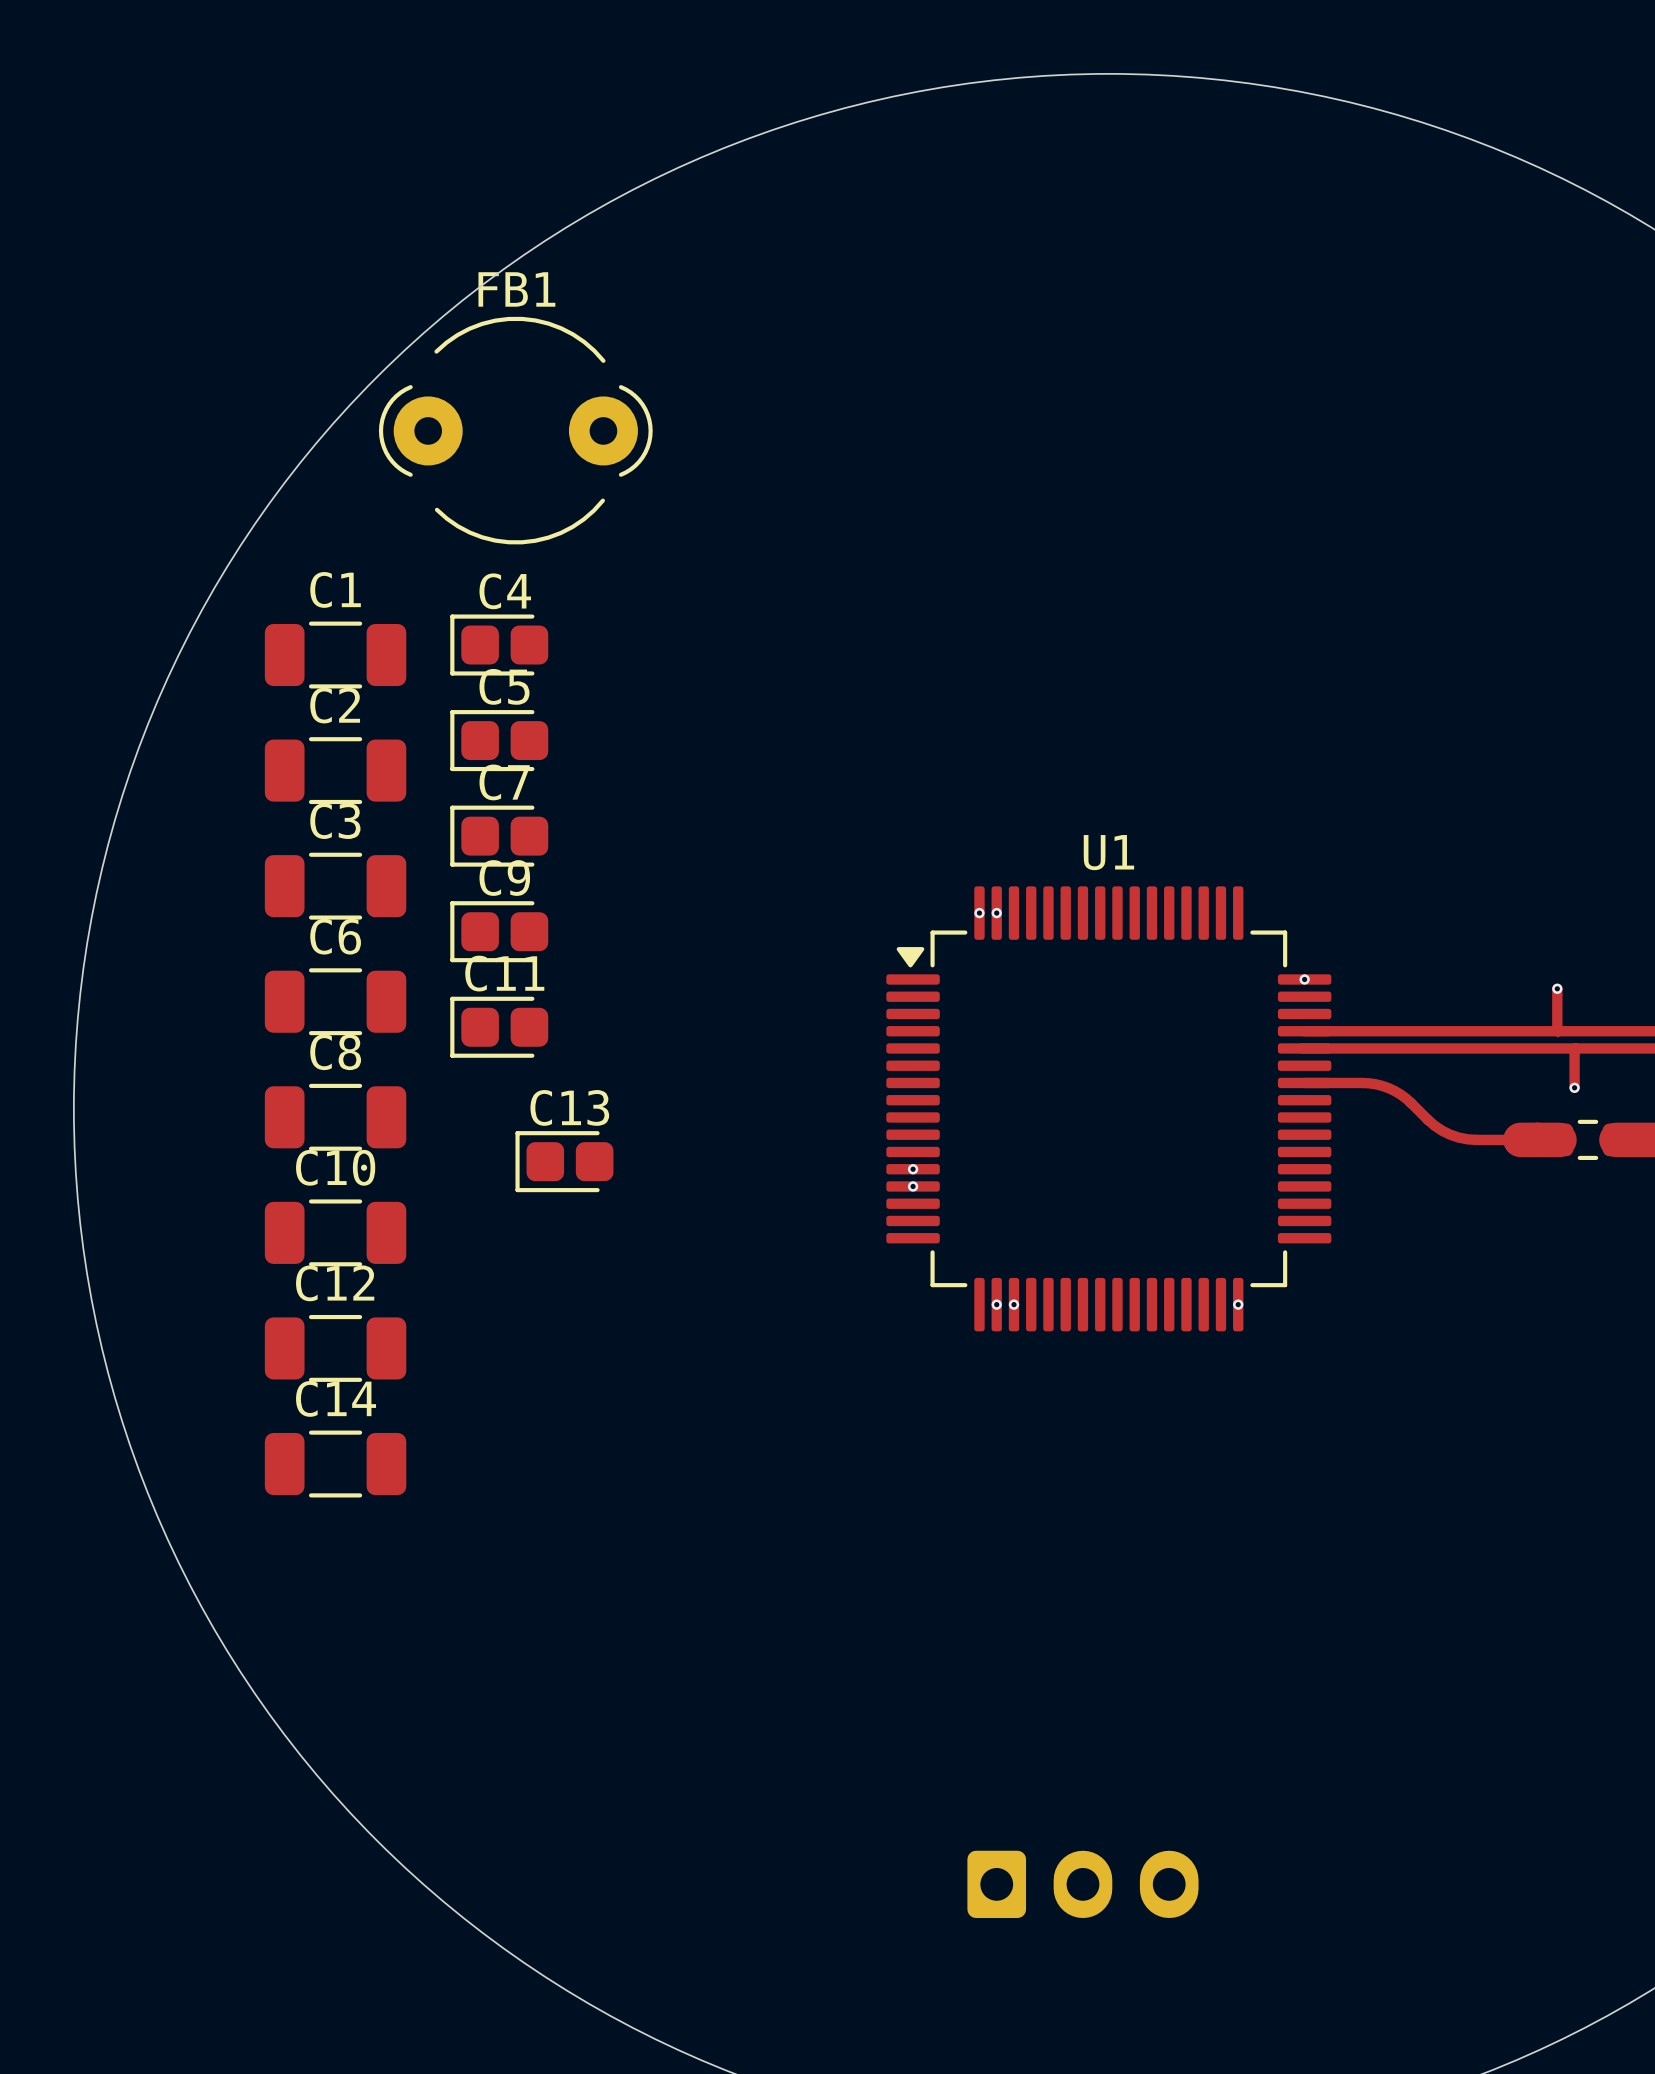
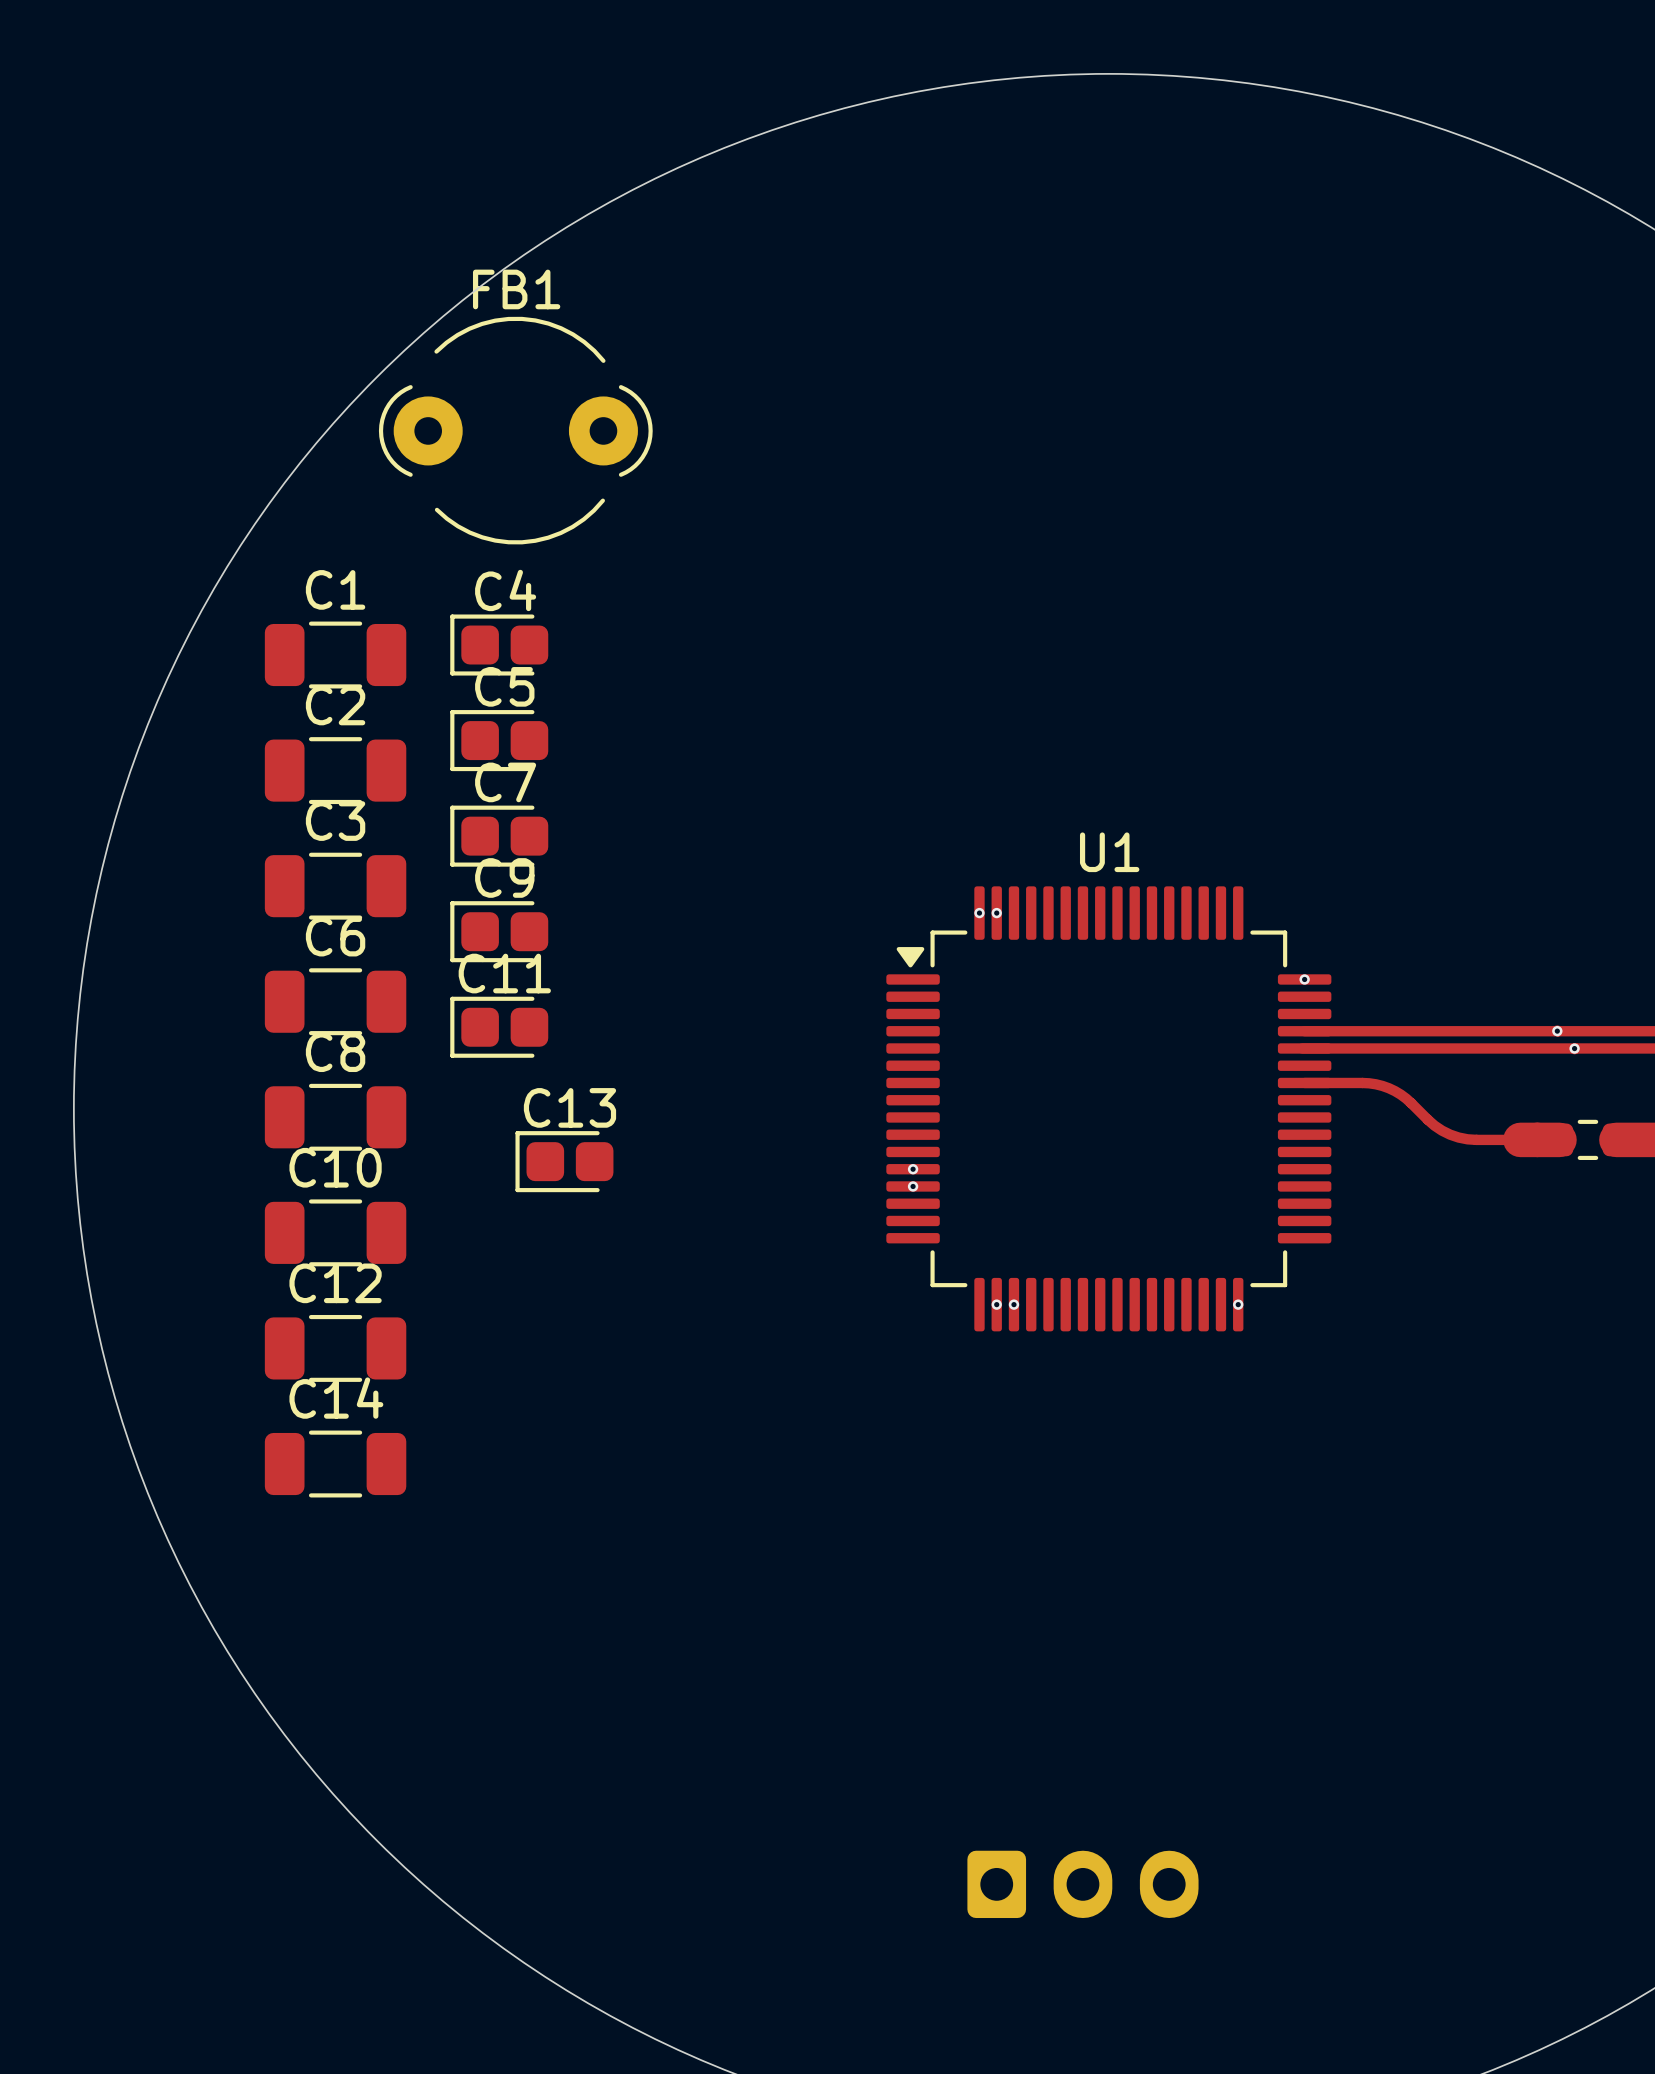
track: (1557, 988) (1557, 1030) -> none
via: (1557, 988) -> none
via: none -> (1557, 1031)
via: none -> (1574, 1048)
track: (1574, 1049) (1574, 1087) -> none
via: (1574, 1087) -> none

